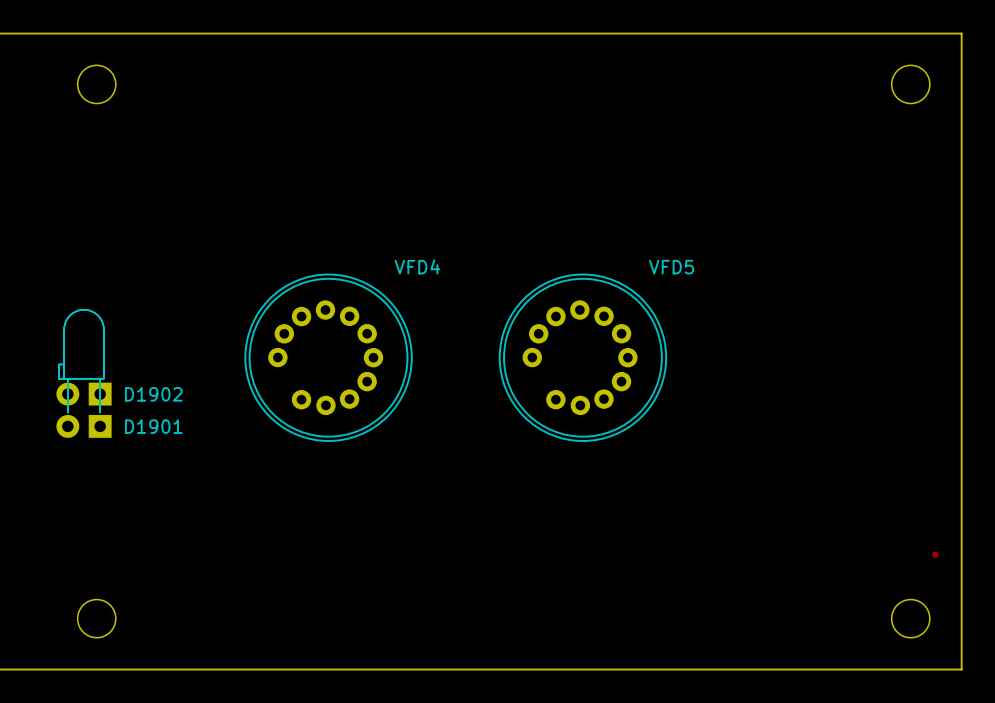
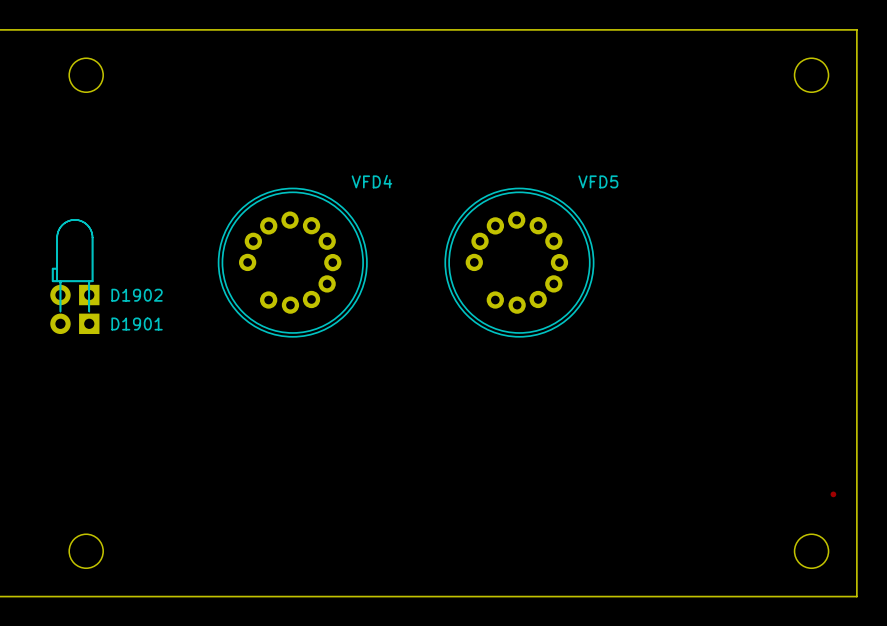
D1902 position: (84, 357) -> (74, 262)
VFD4 position: (328, 357) -> (292, 262)
VFD5 position: (582, 357) -> (519, 262)
D1901 position: (84, 373) -> (74, 276)

